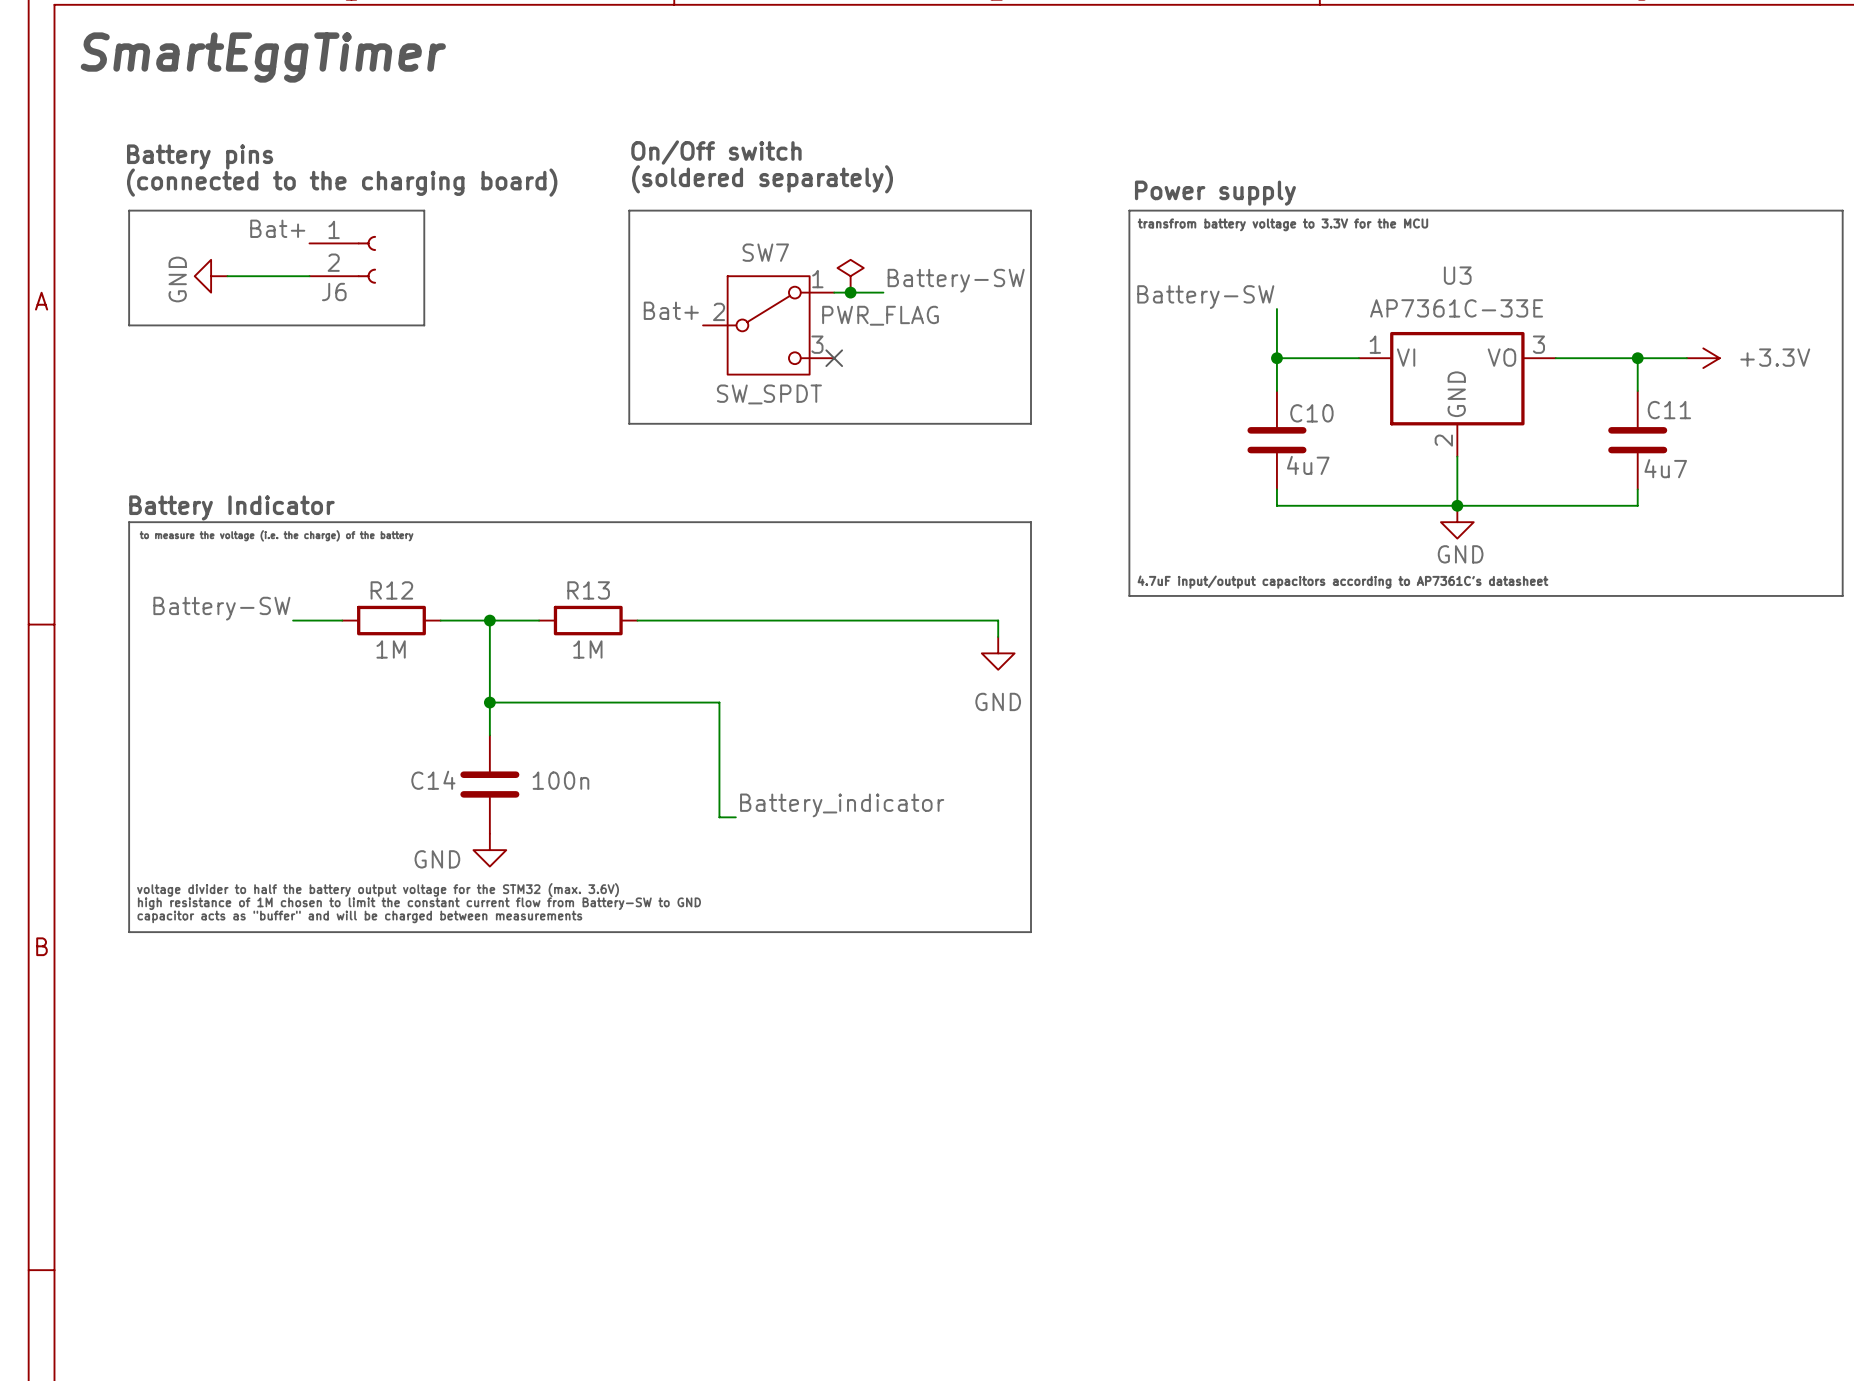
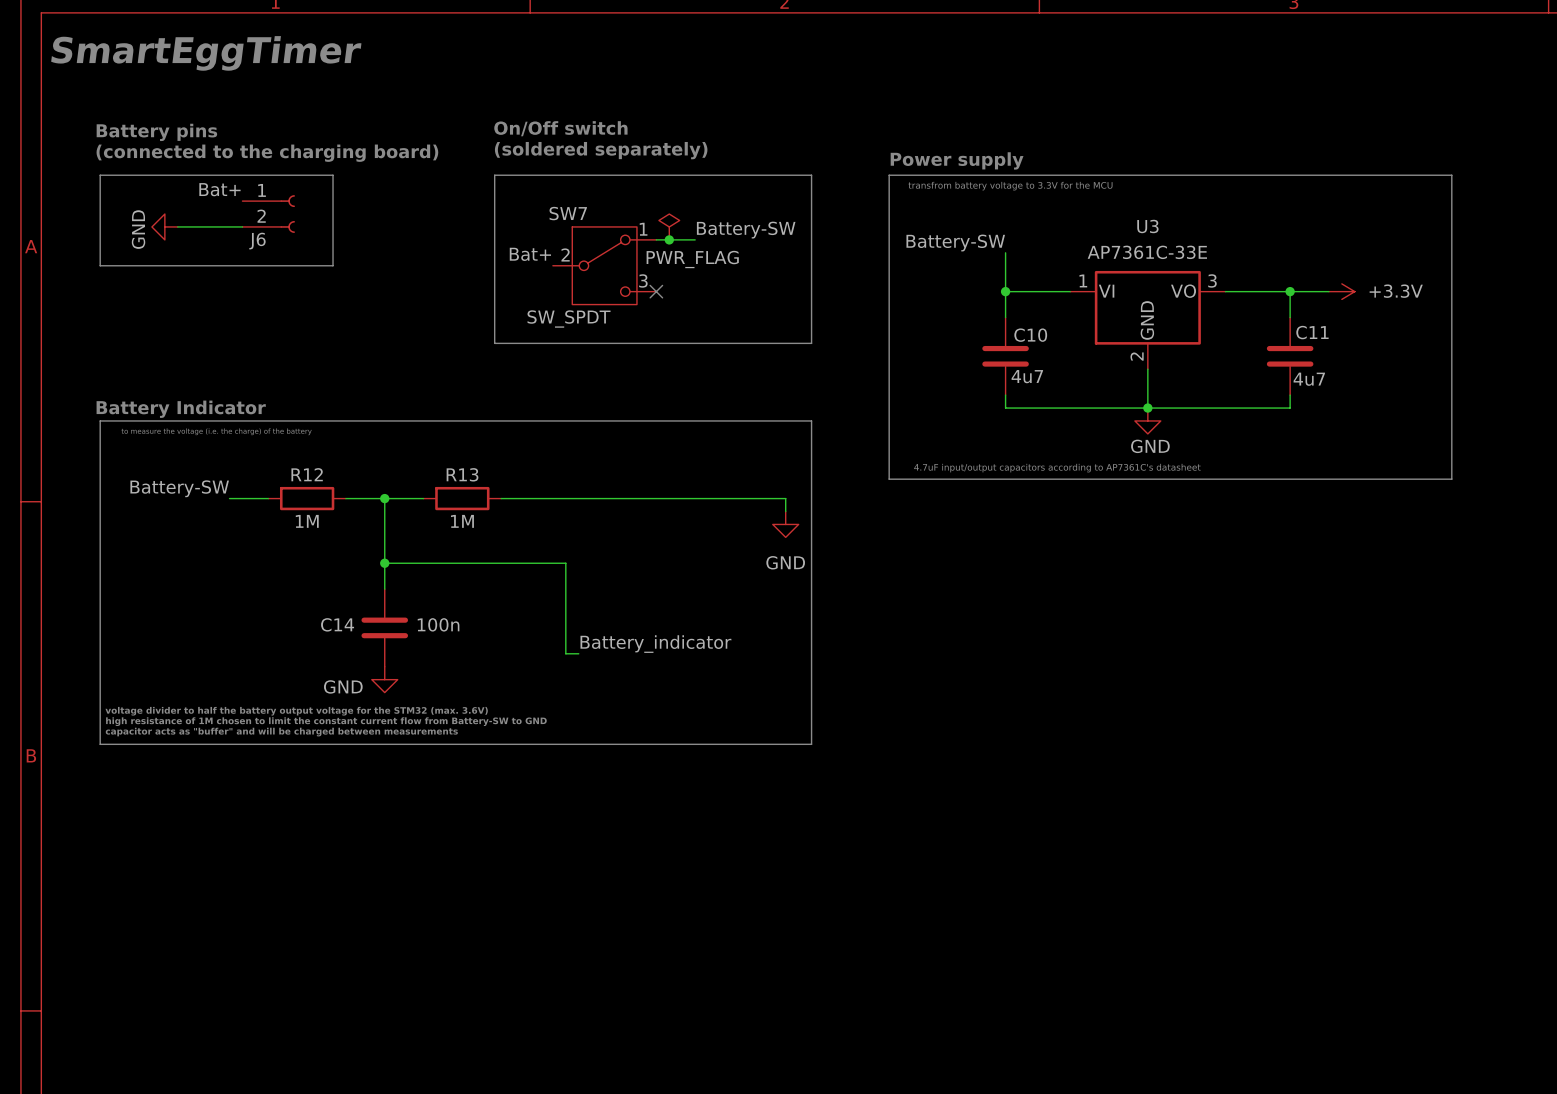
SW7 name position: SW7 (765, 252) -> SW7 (568, 213)
SW7 value position: SW_SPDT (769, 394) -> SW_SPDT (569, 318)

